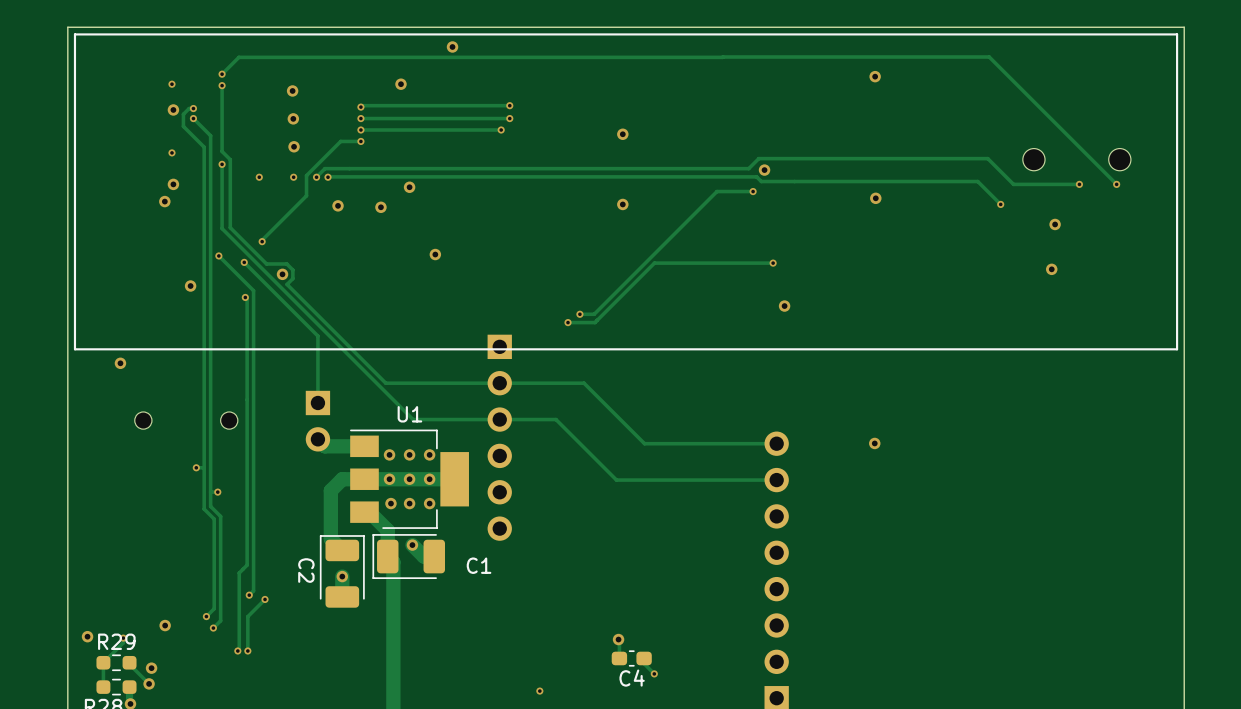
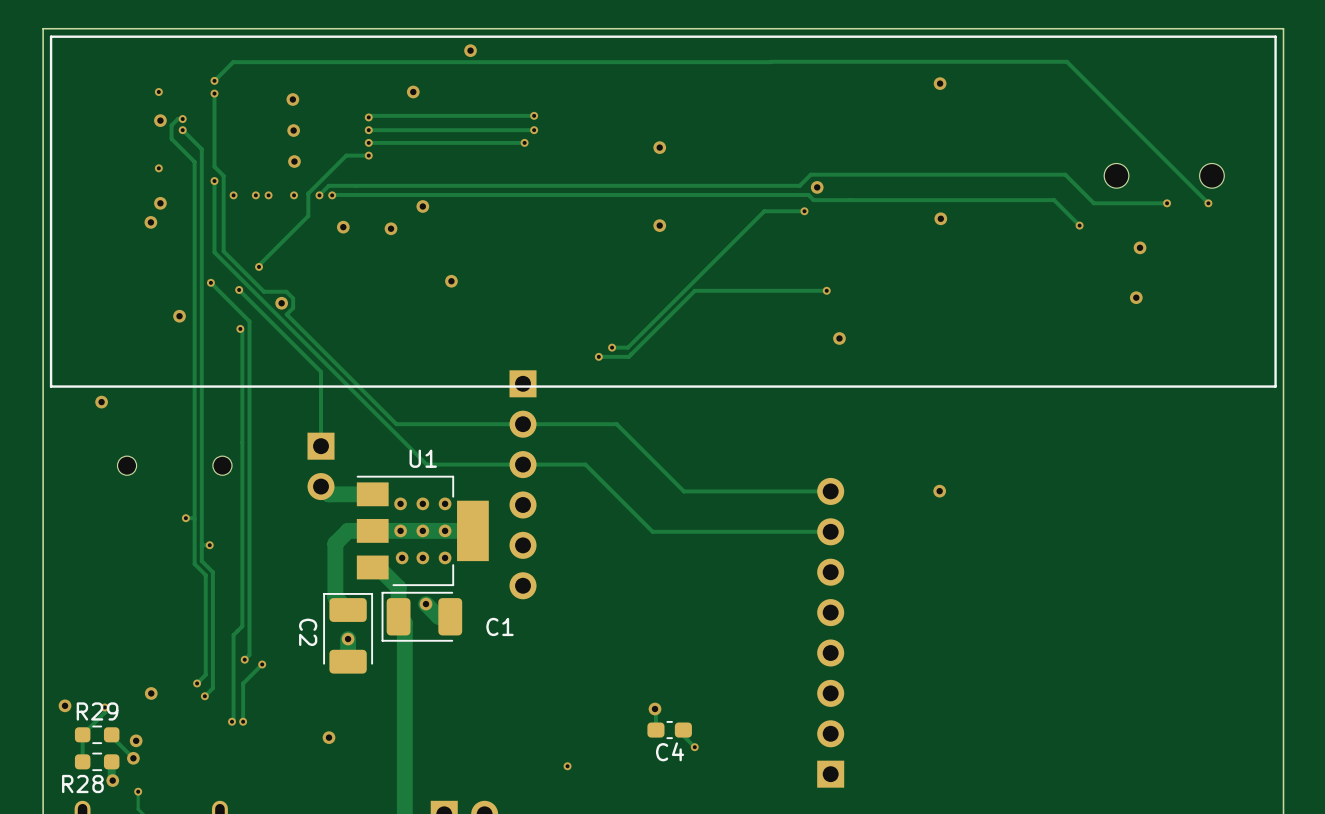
via: none -> (233, 195)
via: none -> (268, 195)
via: none -> (329, 737)

